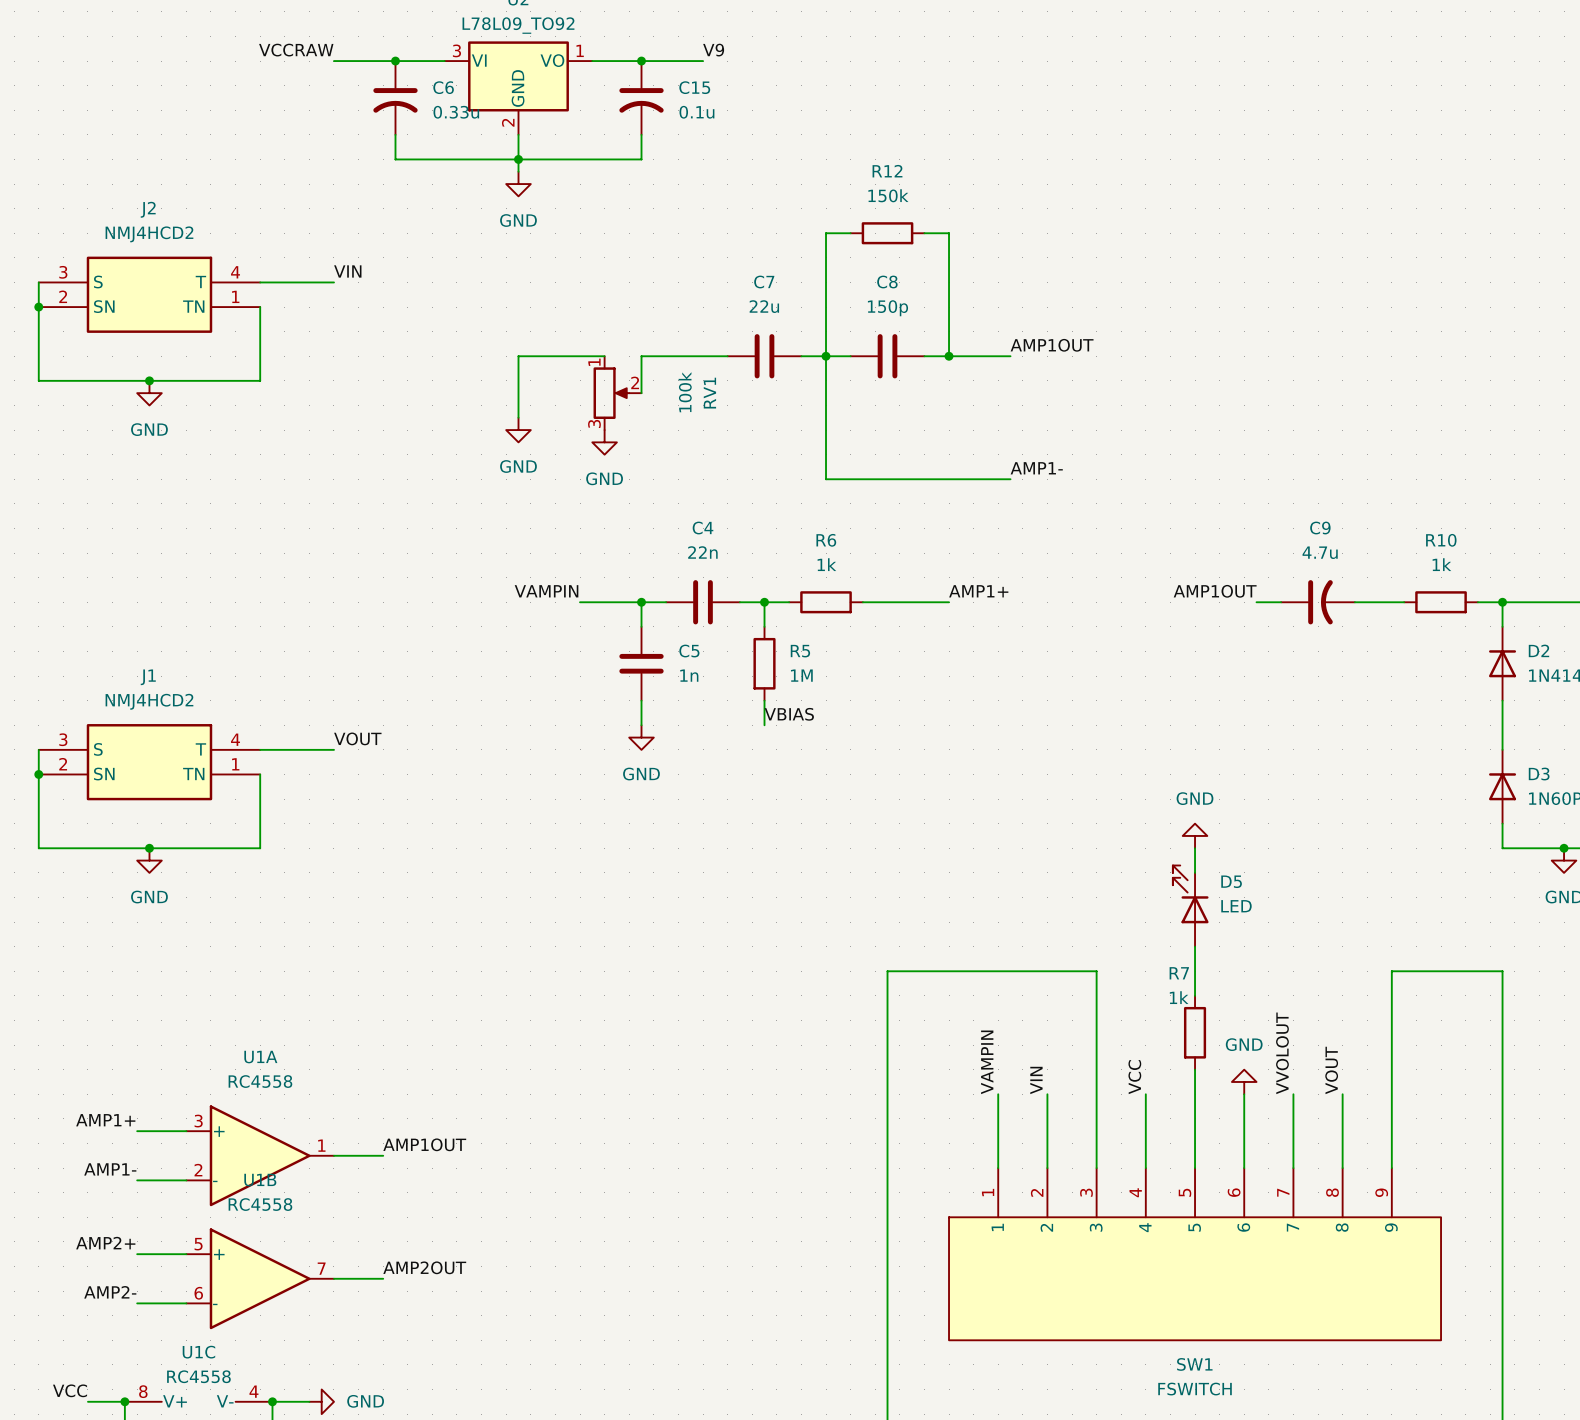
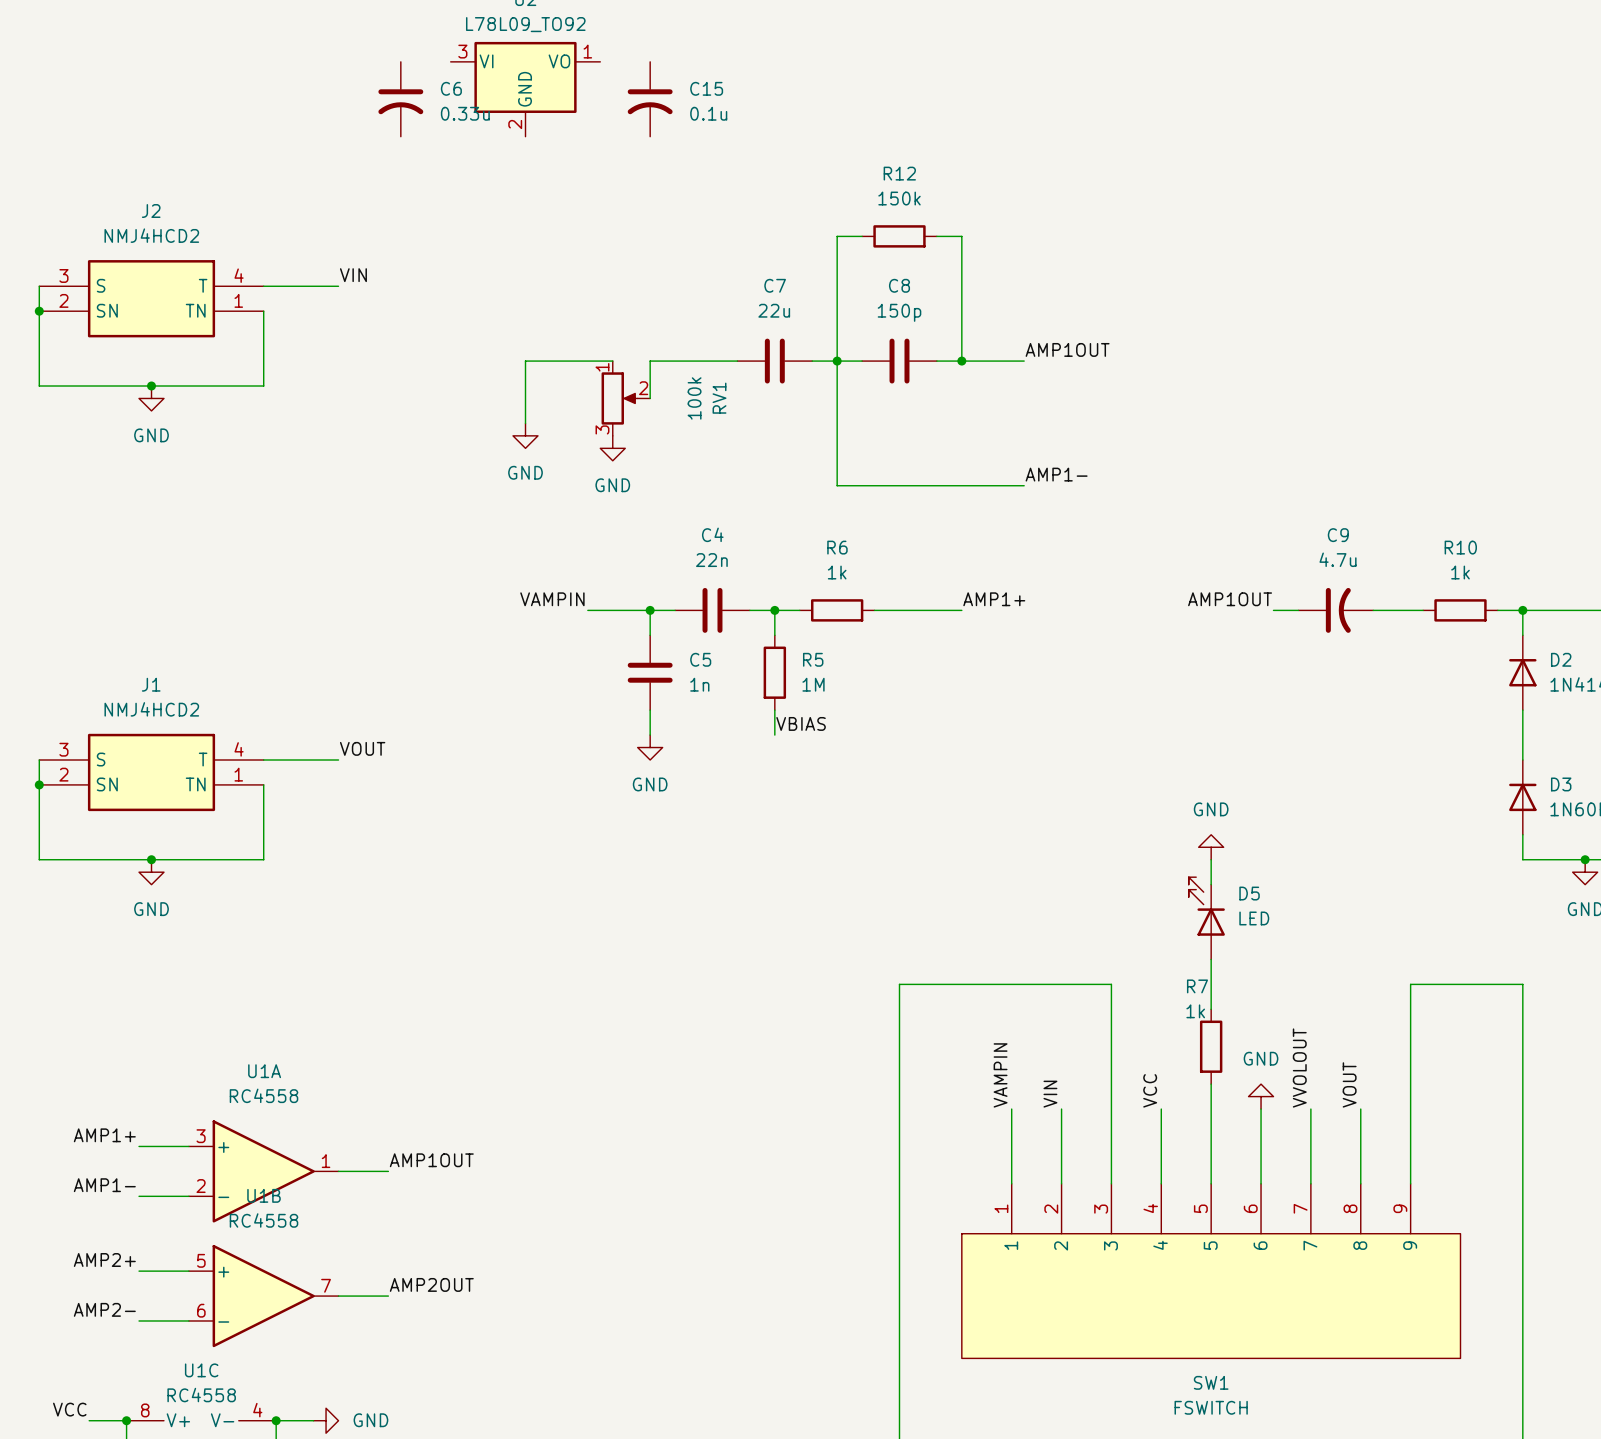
label: VCCRAW (296, 50) -> none
label: V9 (713, 50) -> none
wire: (333, 61) (444, 61) -> none
junction: (395, 61) -> none
wire: (592, 61) (703, 61) -> none
junction: (641, 61) -> none
wire: (395, 134) (395, 159) (641, 159) (641, 134) -> none
wire: (518, 134) (518, 171) -> none
junction: (518, 159) -> none
power symbol: GND (518, 184) -> none

